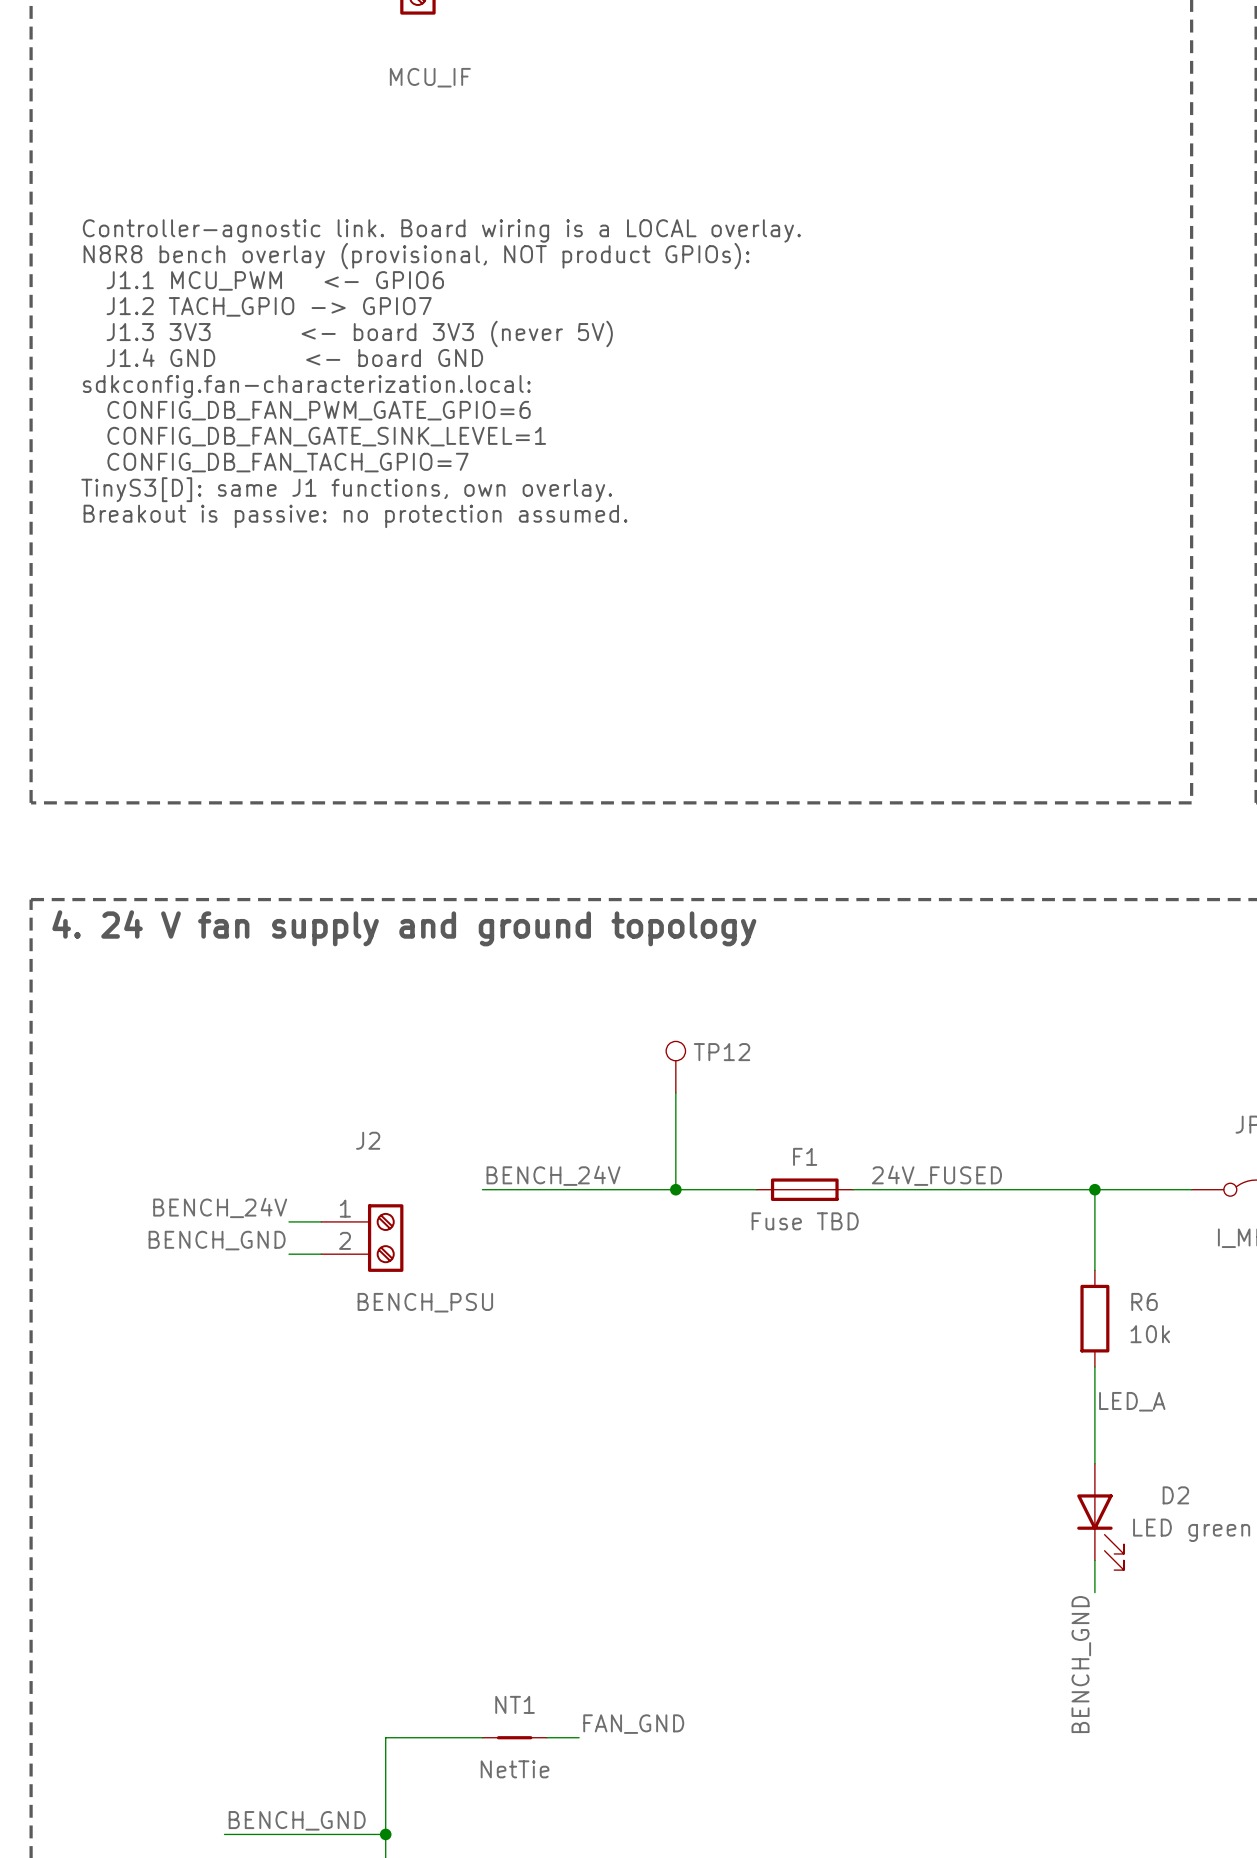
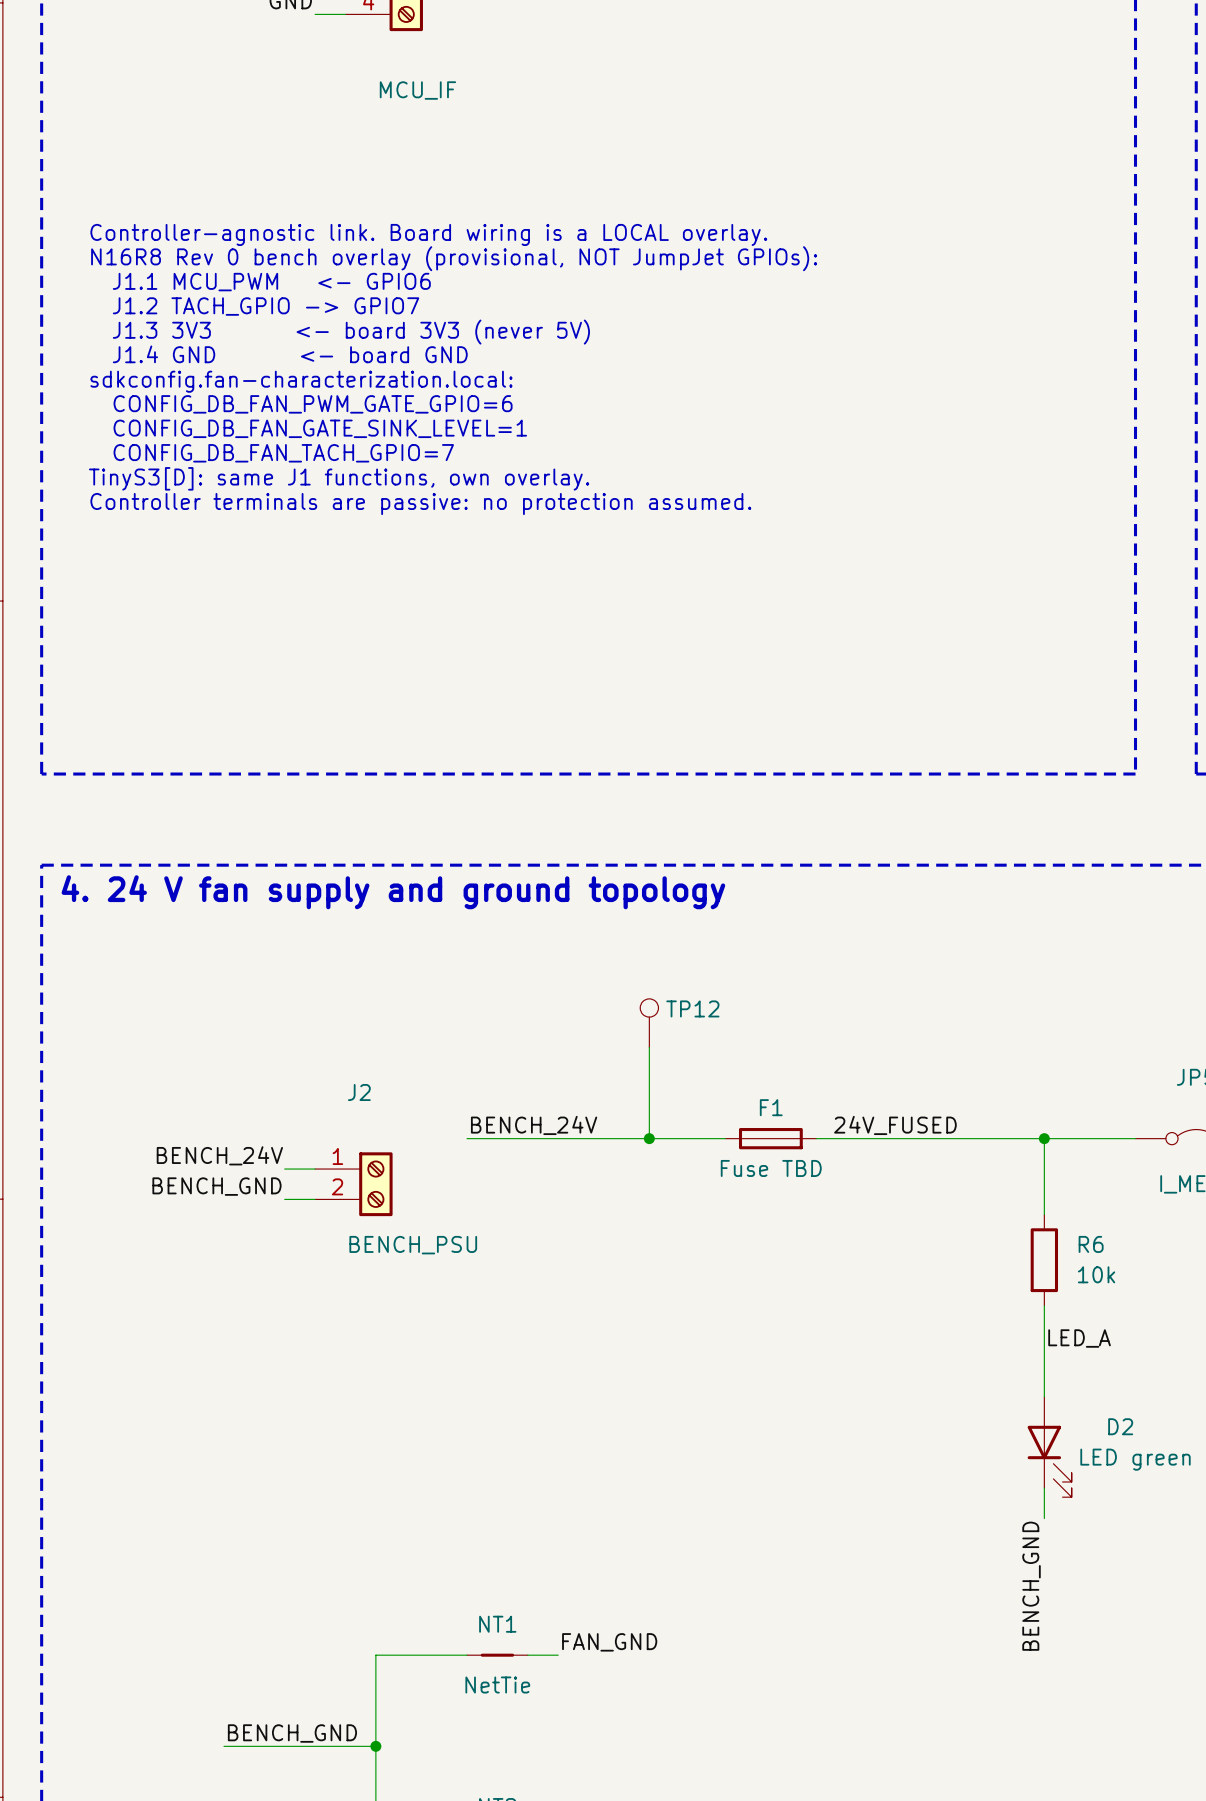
text: N8R8 bench overlay (provisional, NOT product GPIOs): (416, 256) -> N16R8 Rev 0 bench overlay (provisional, NOT JumpJet GPIOs): (454, 258)
text: Breakout is passive: no protection assumed. (355, 516) -> Controller terminals are passive: no protection assumed. (420, 504)

